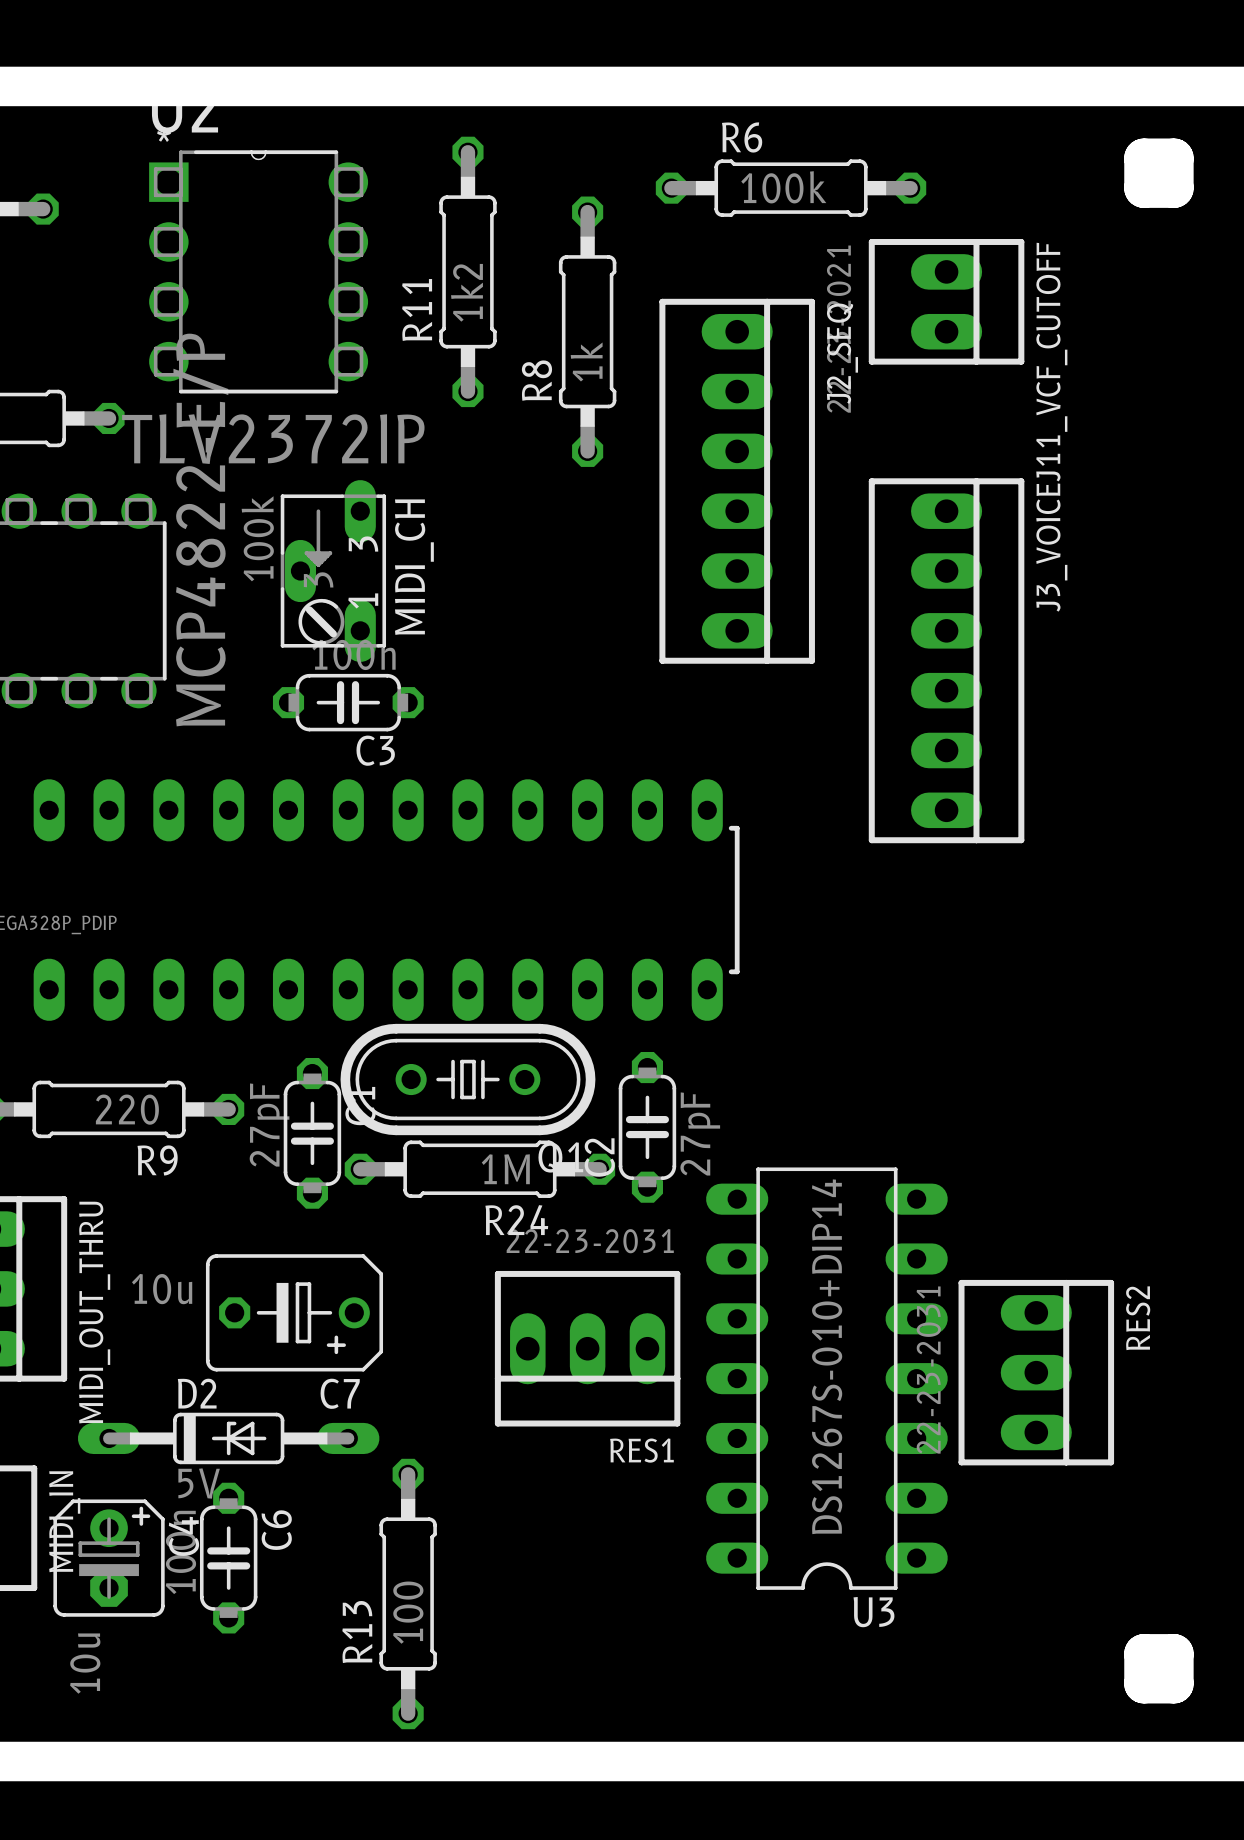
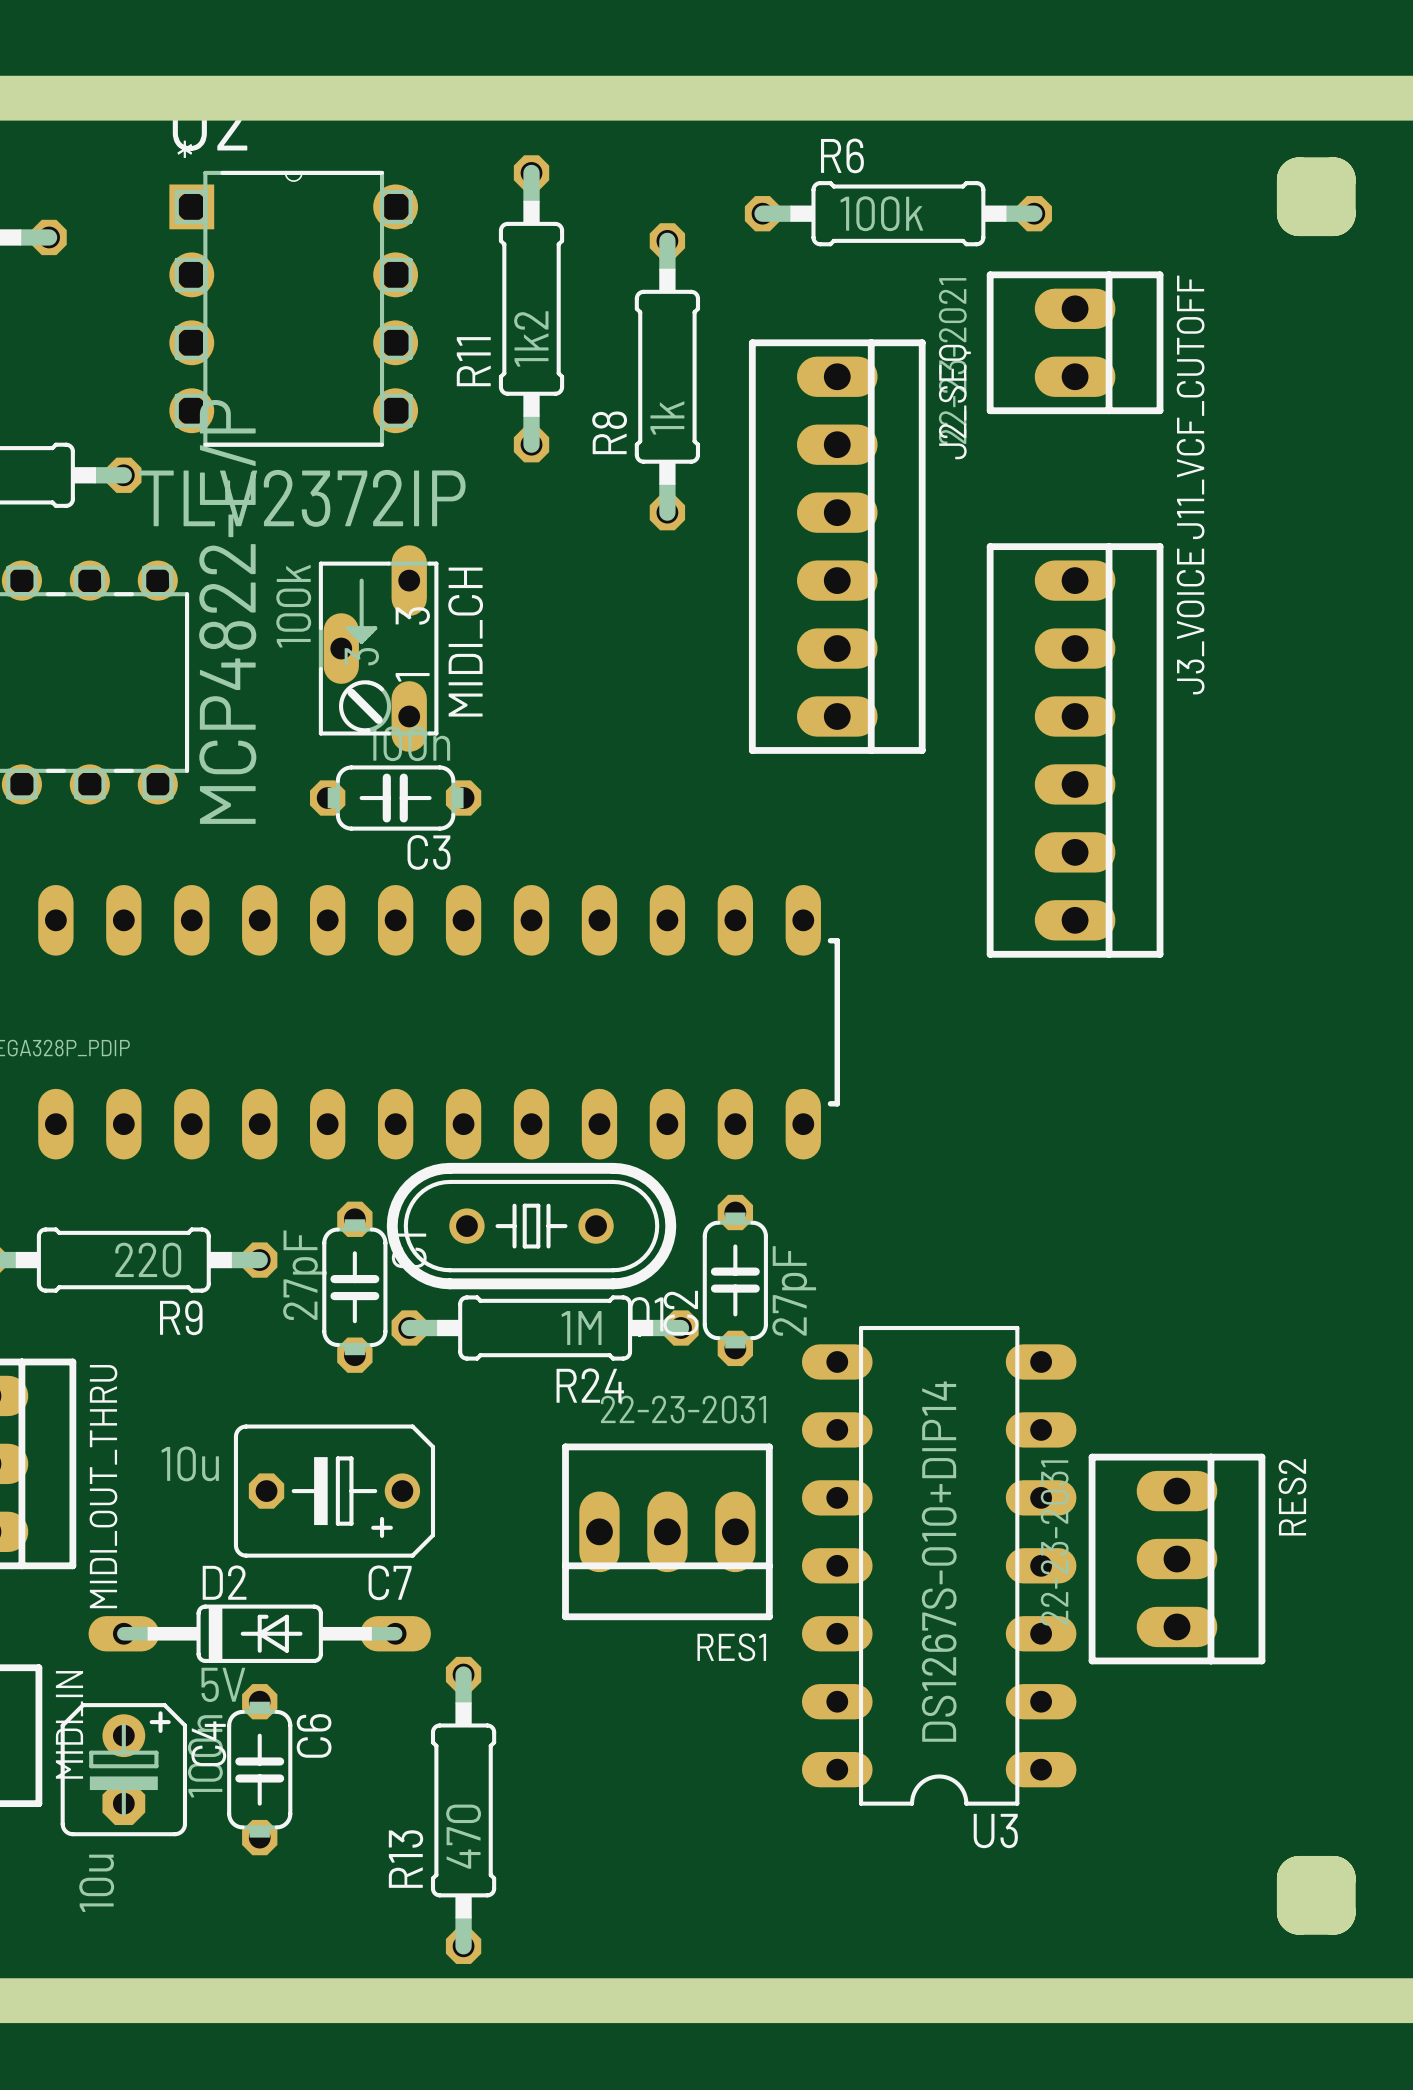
R13 value: 100 (408, 1612) -> 470 (463, 1836)

